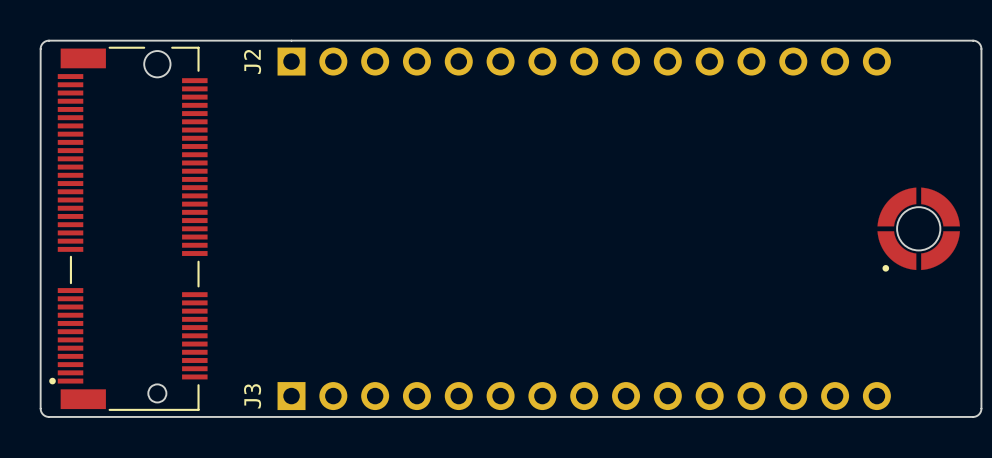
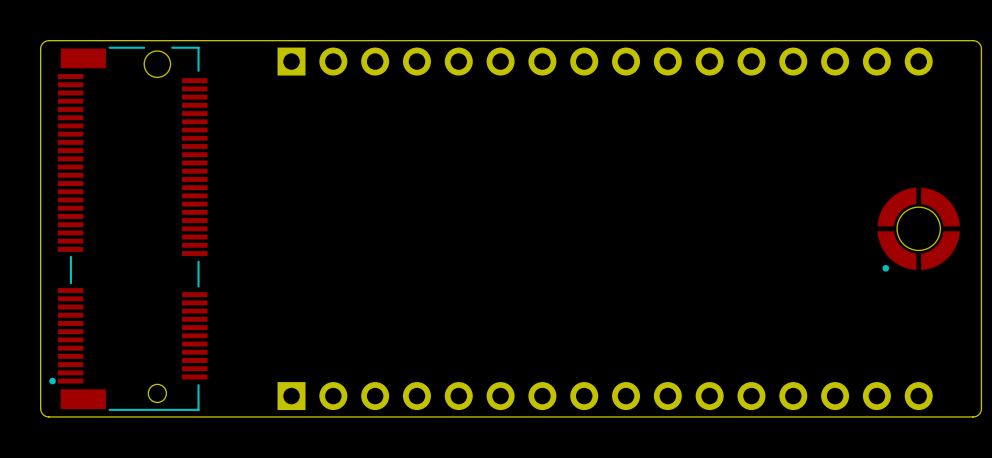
J2: (584, 61) -> none
part: none -> (605, 61)
J3: (584, 396) -> none
part: none -> (605, 396)

